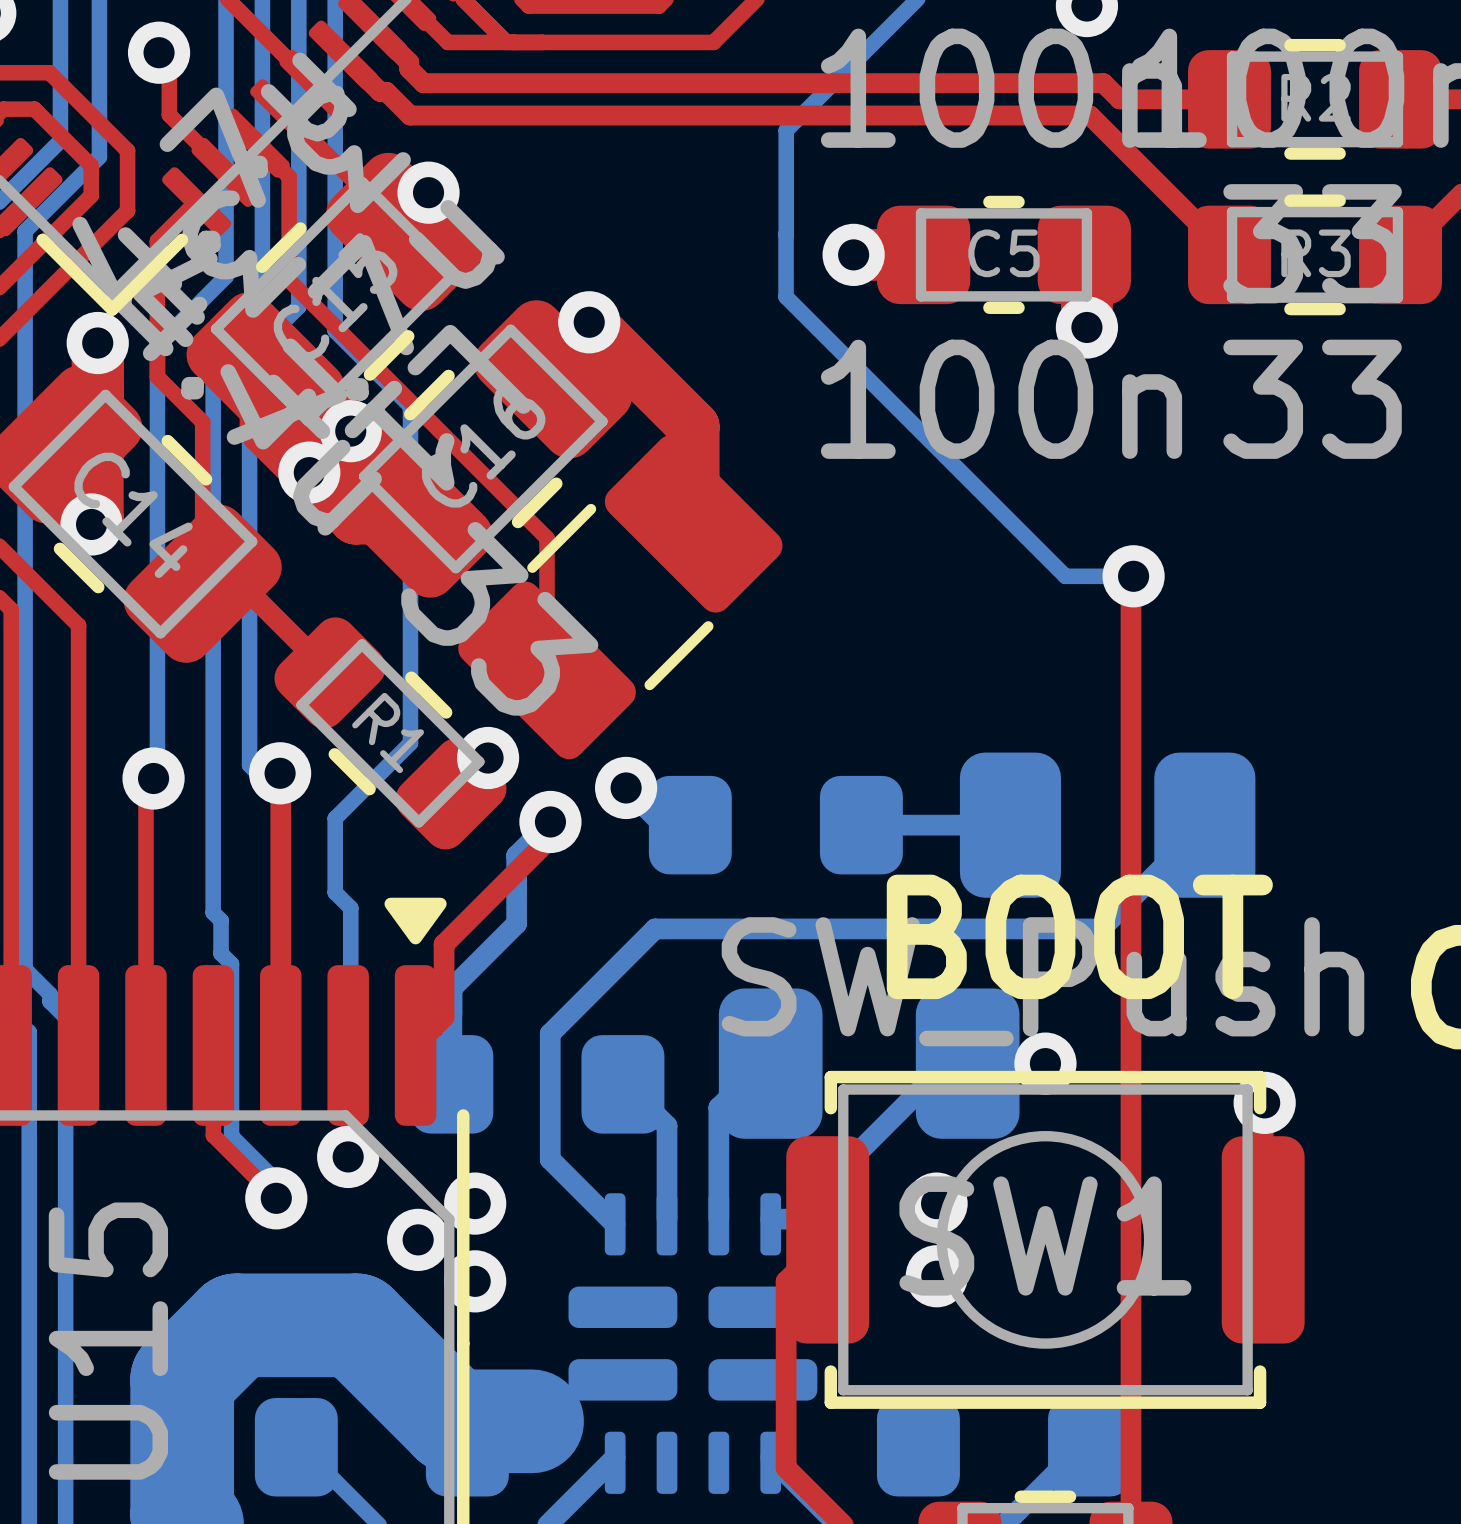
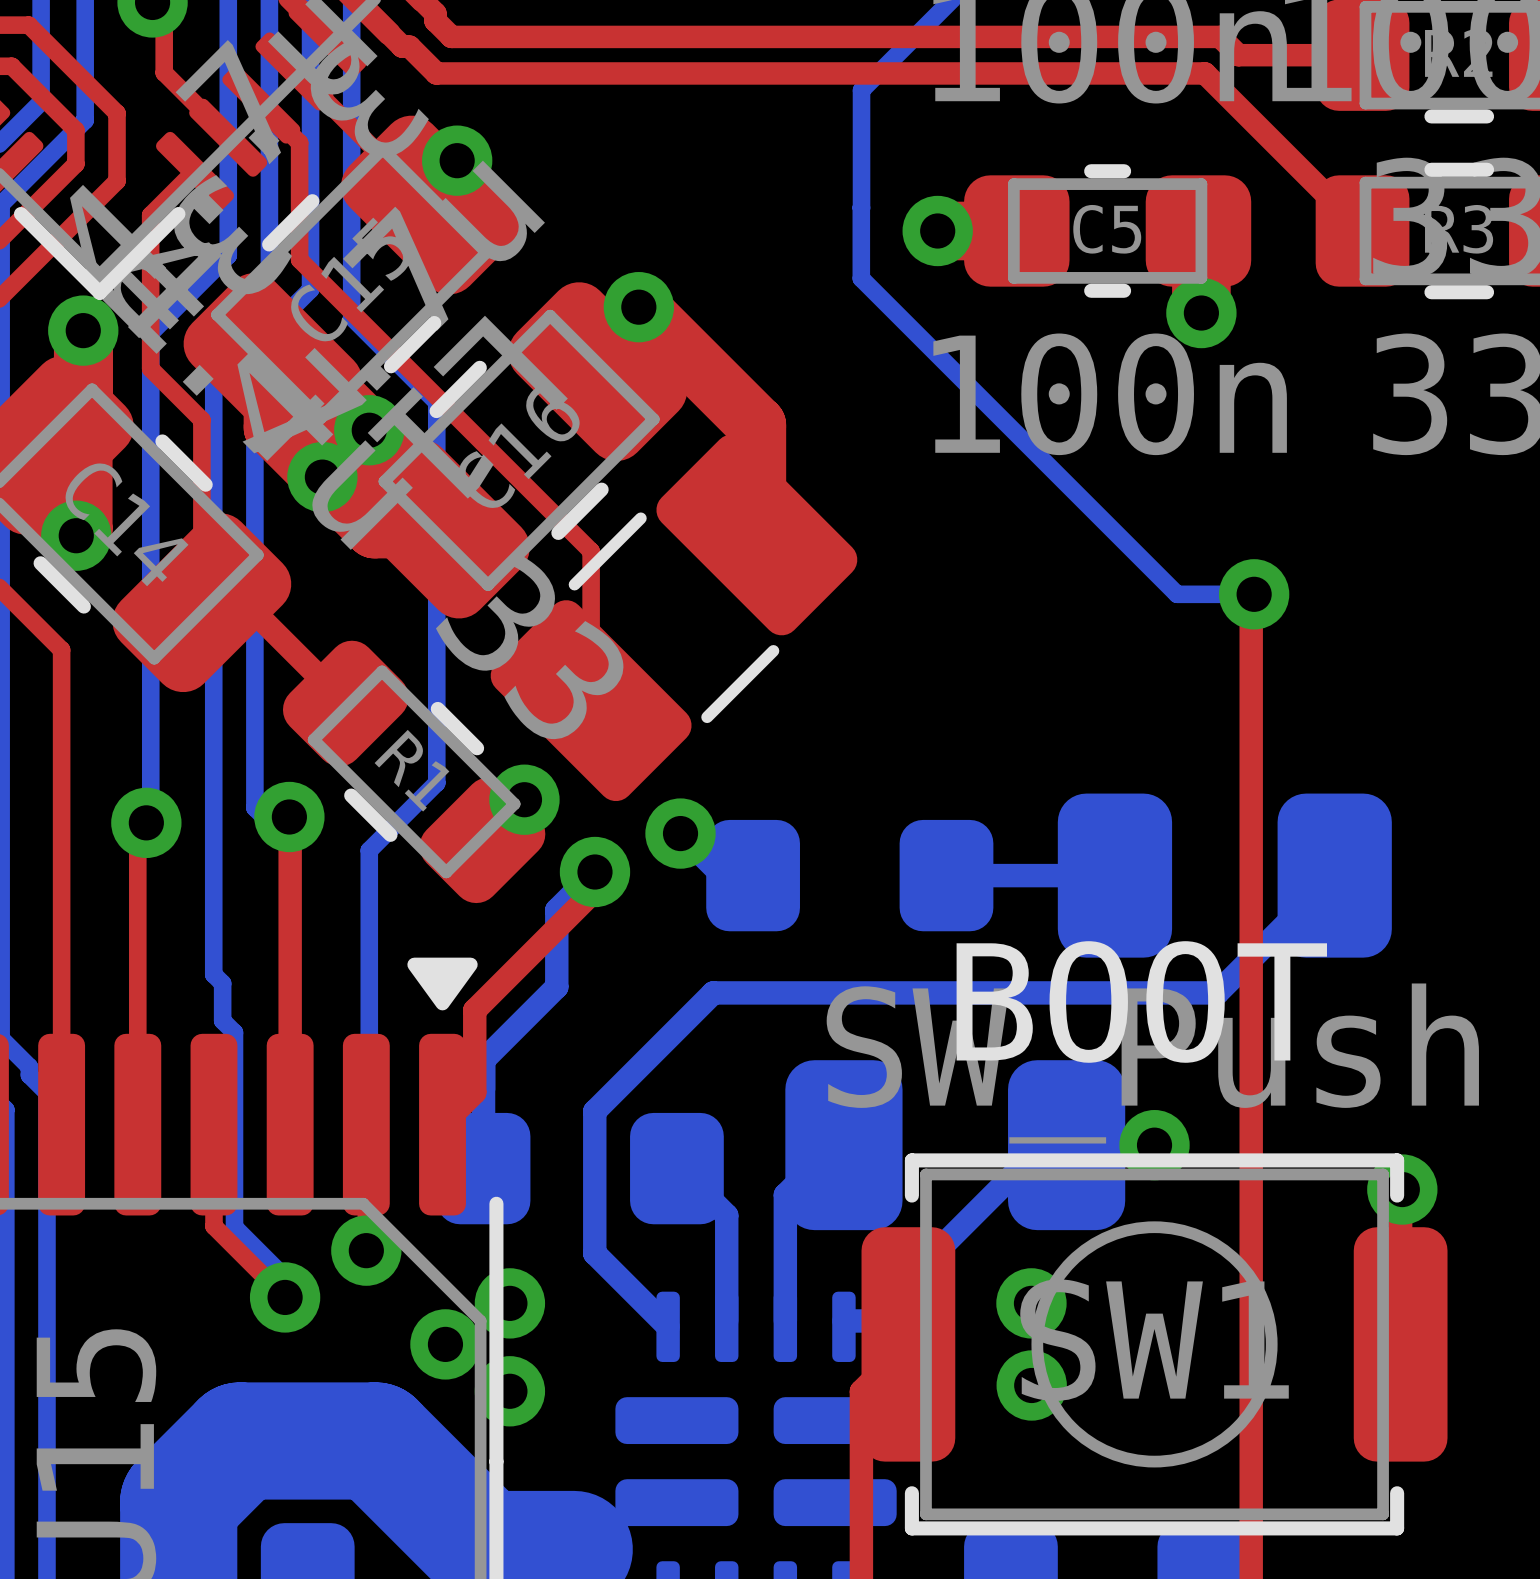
bottom track: (350, 802) (335, 818) (335, 892) (350, 908) -> (369, 850) (369, 969)

